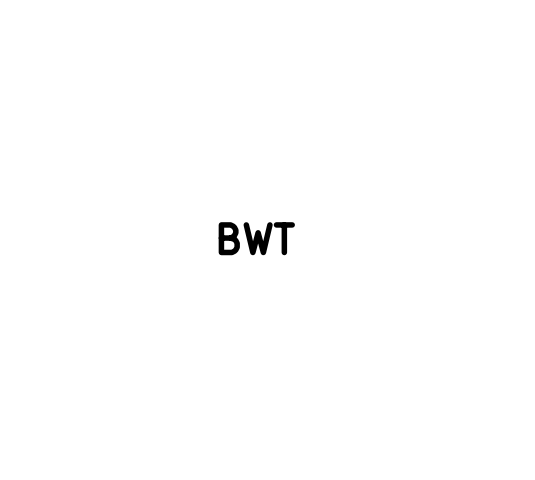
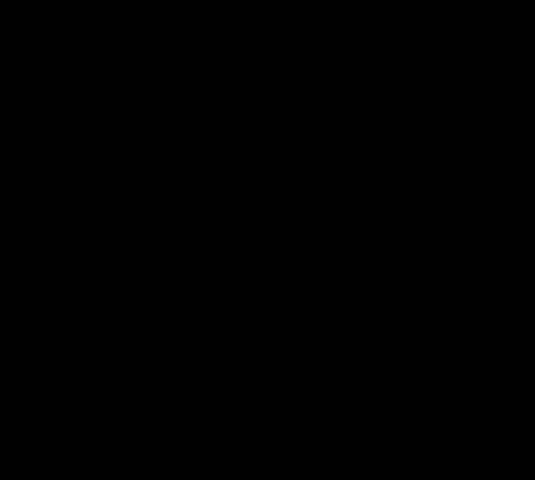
text: BWT (256, 238) -> none

